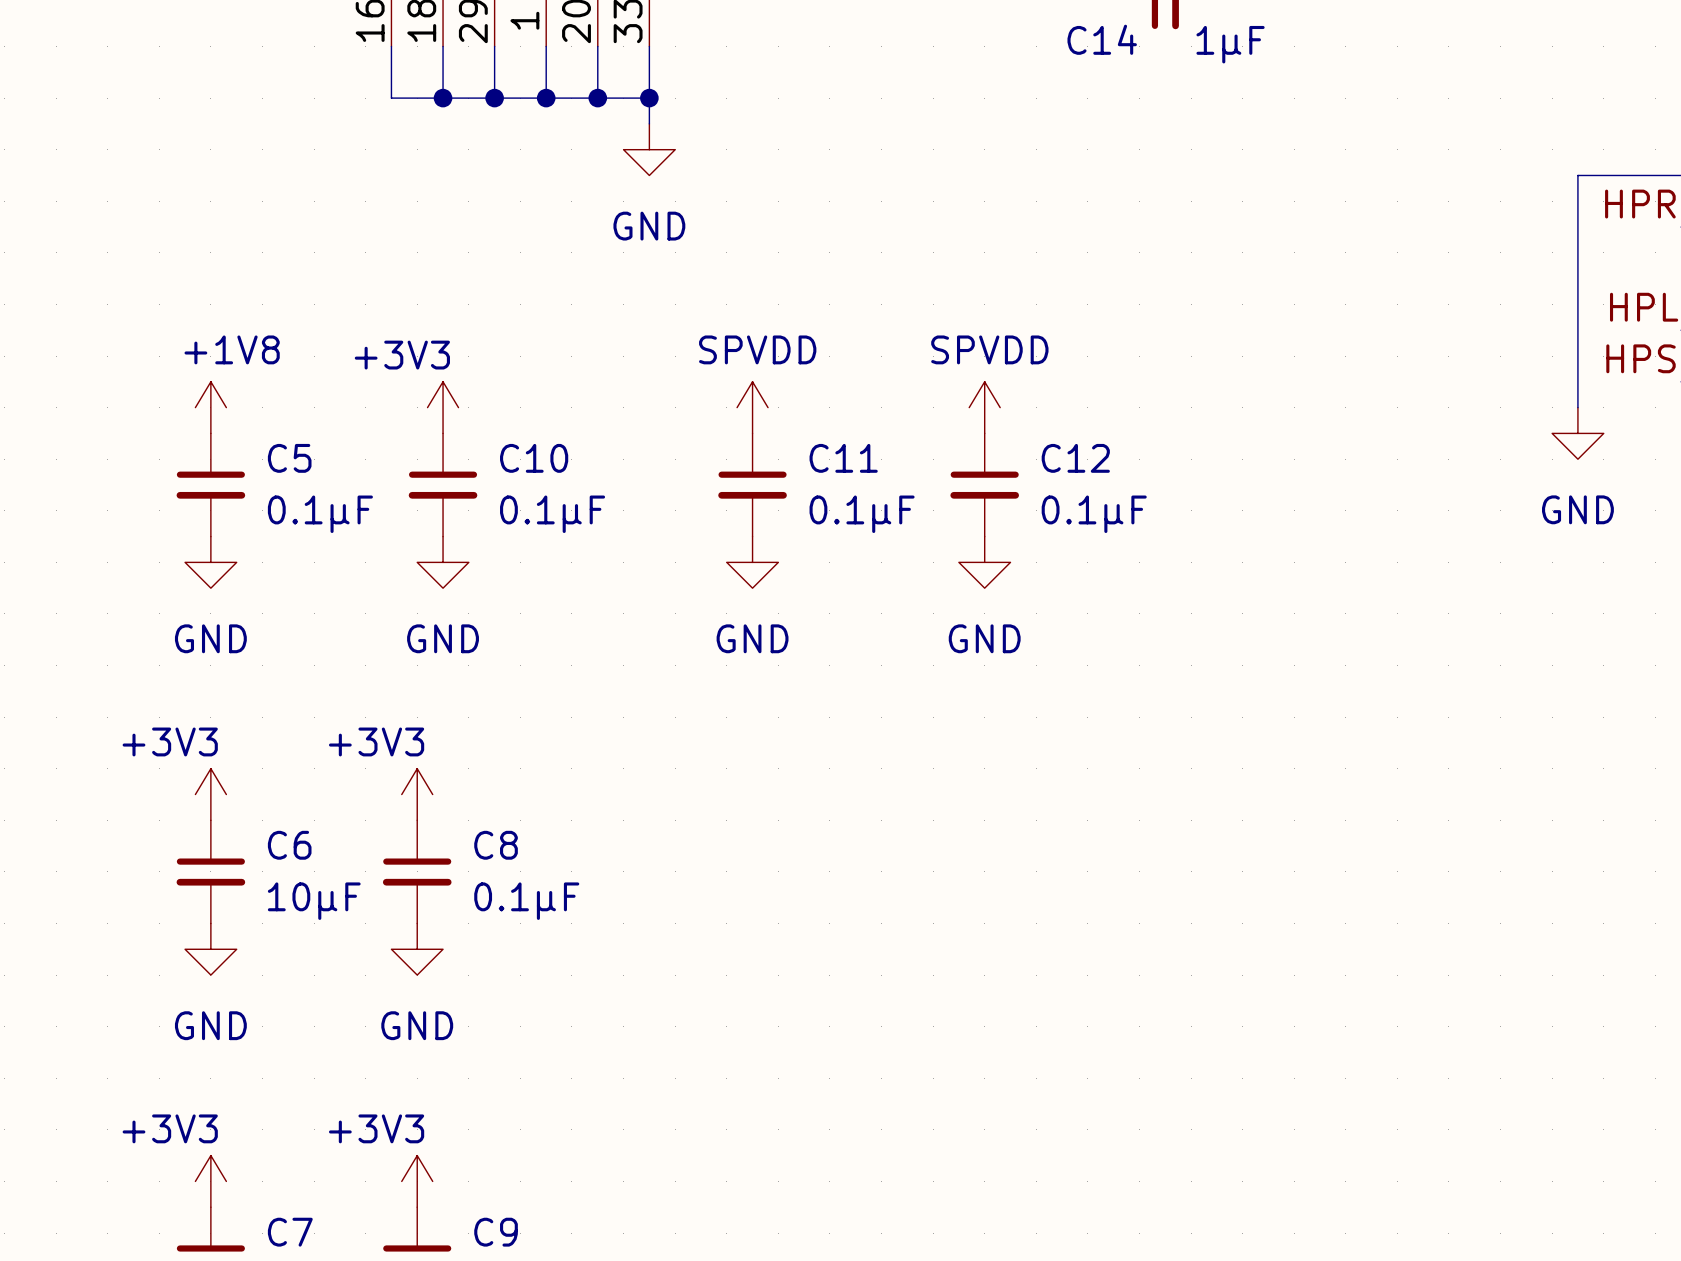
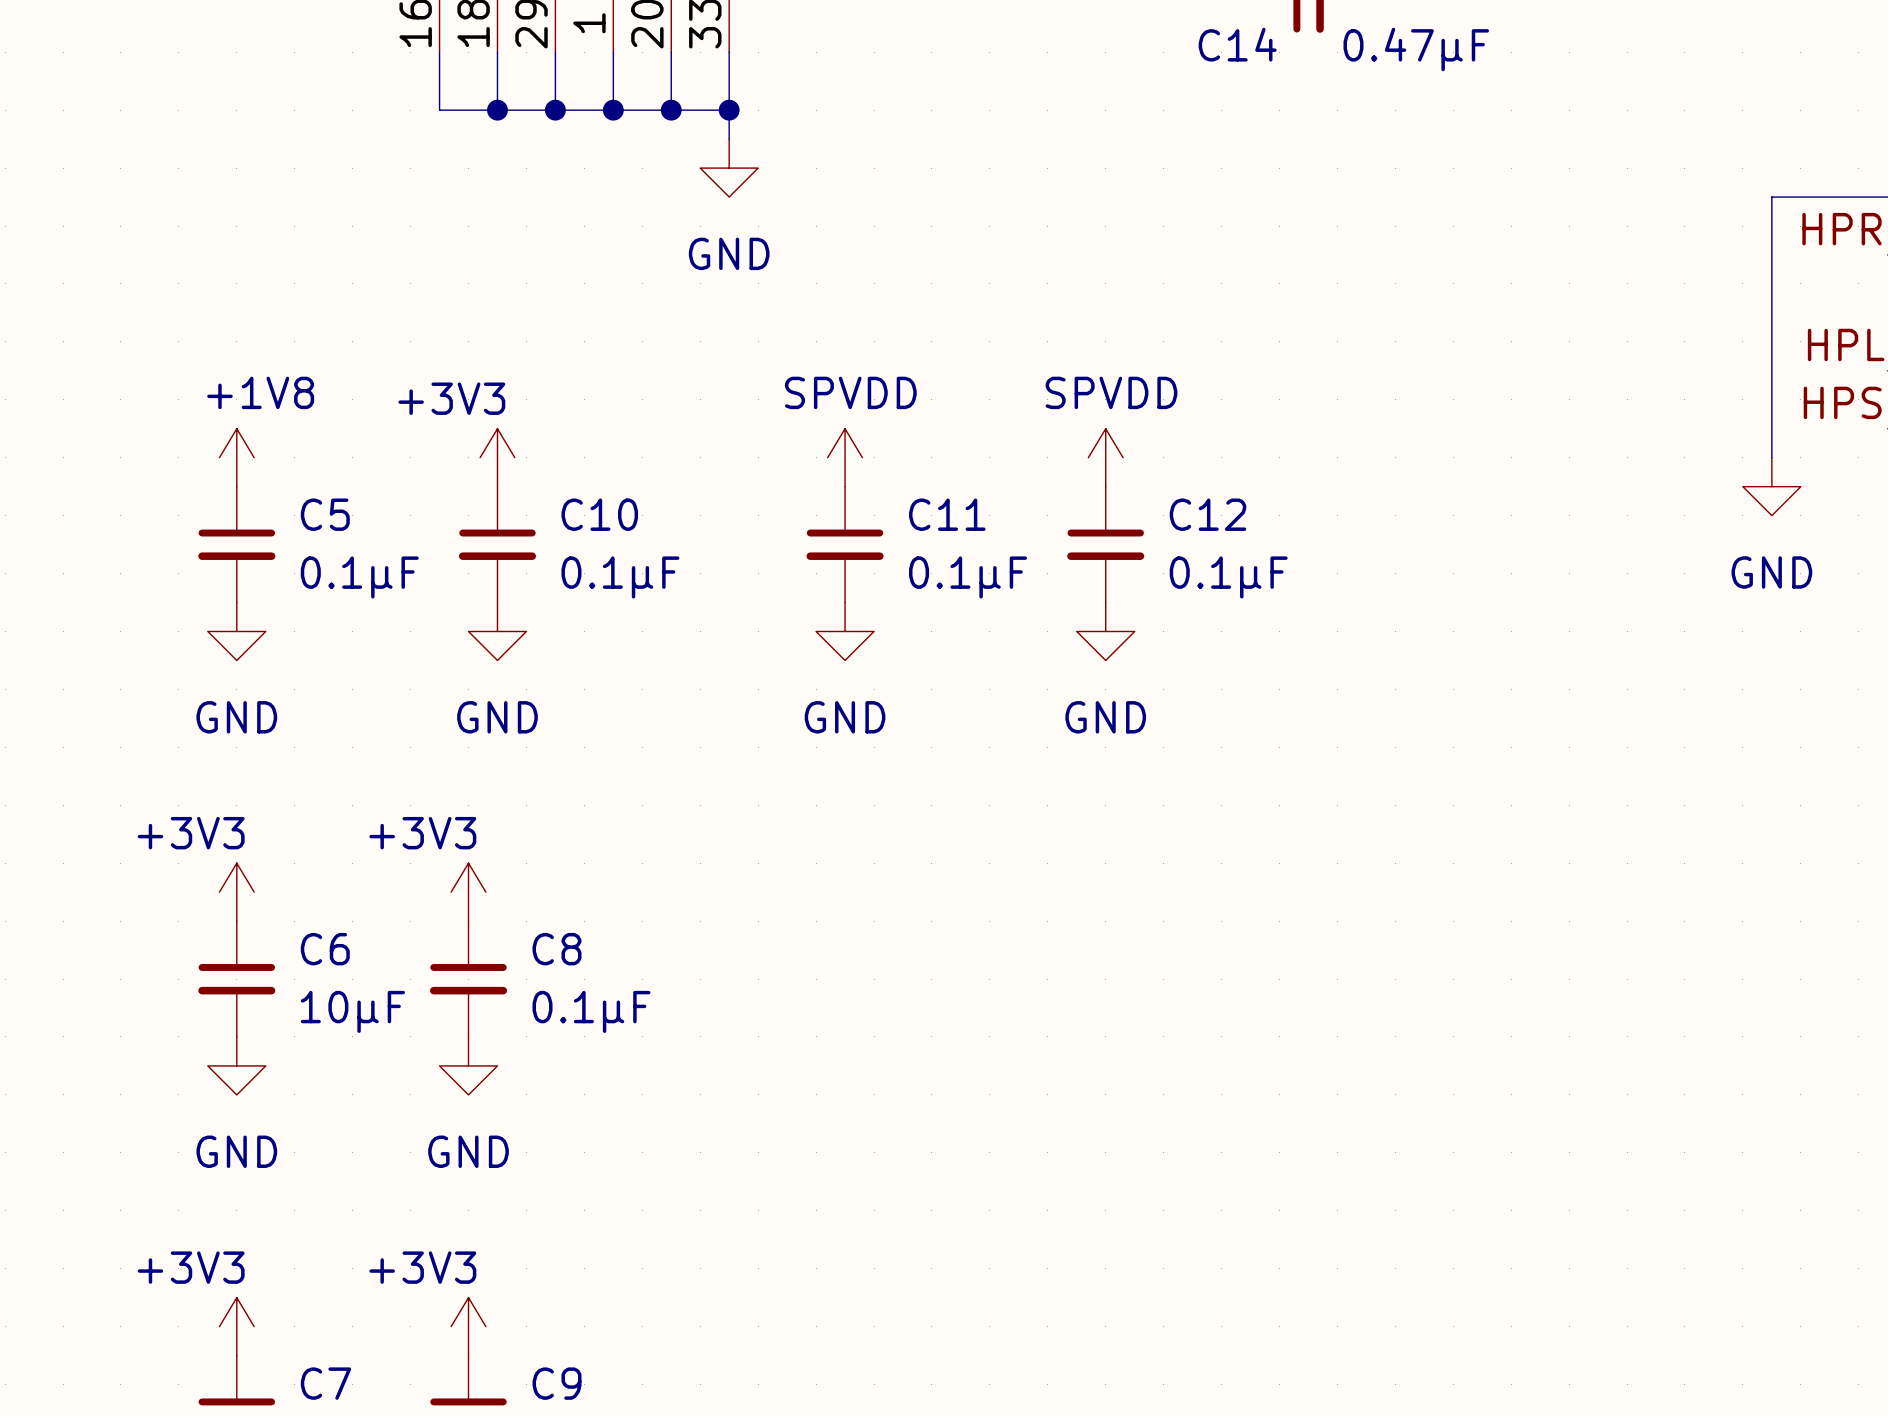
C14 value: 1µF (1230, 44) -> 0.47µF (1416, 49)

